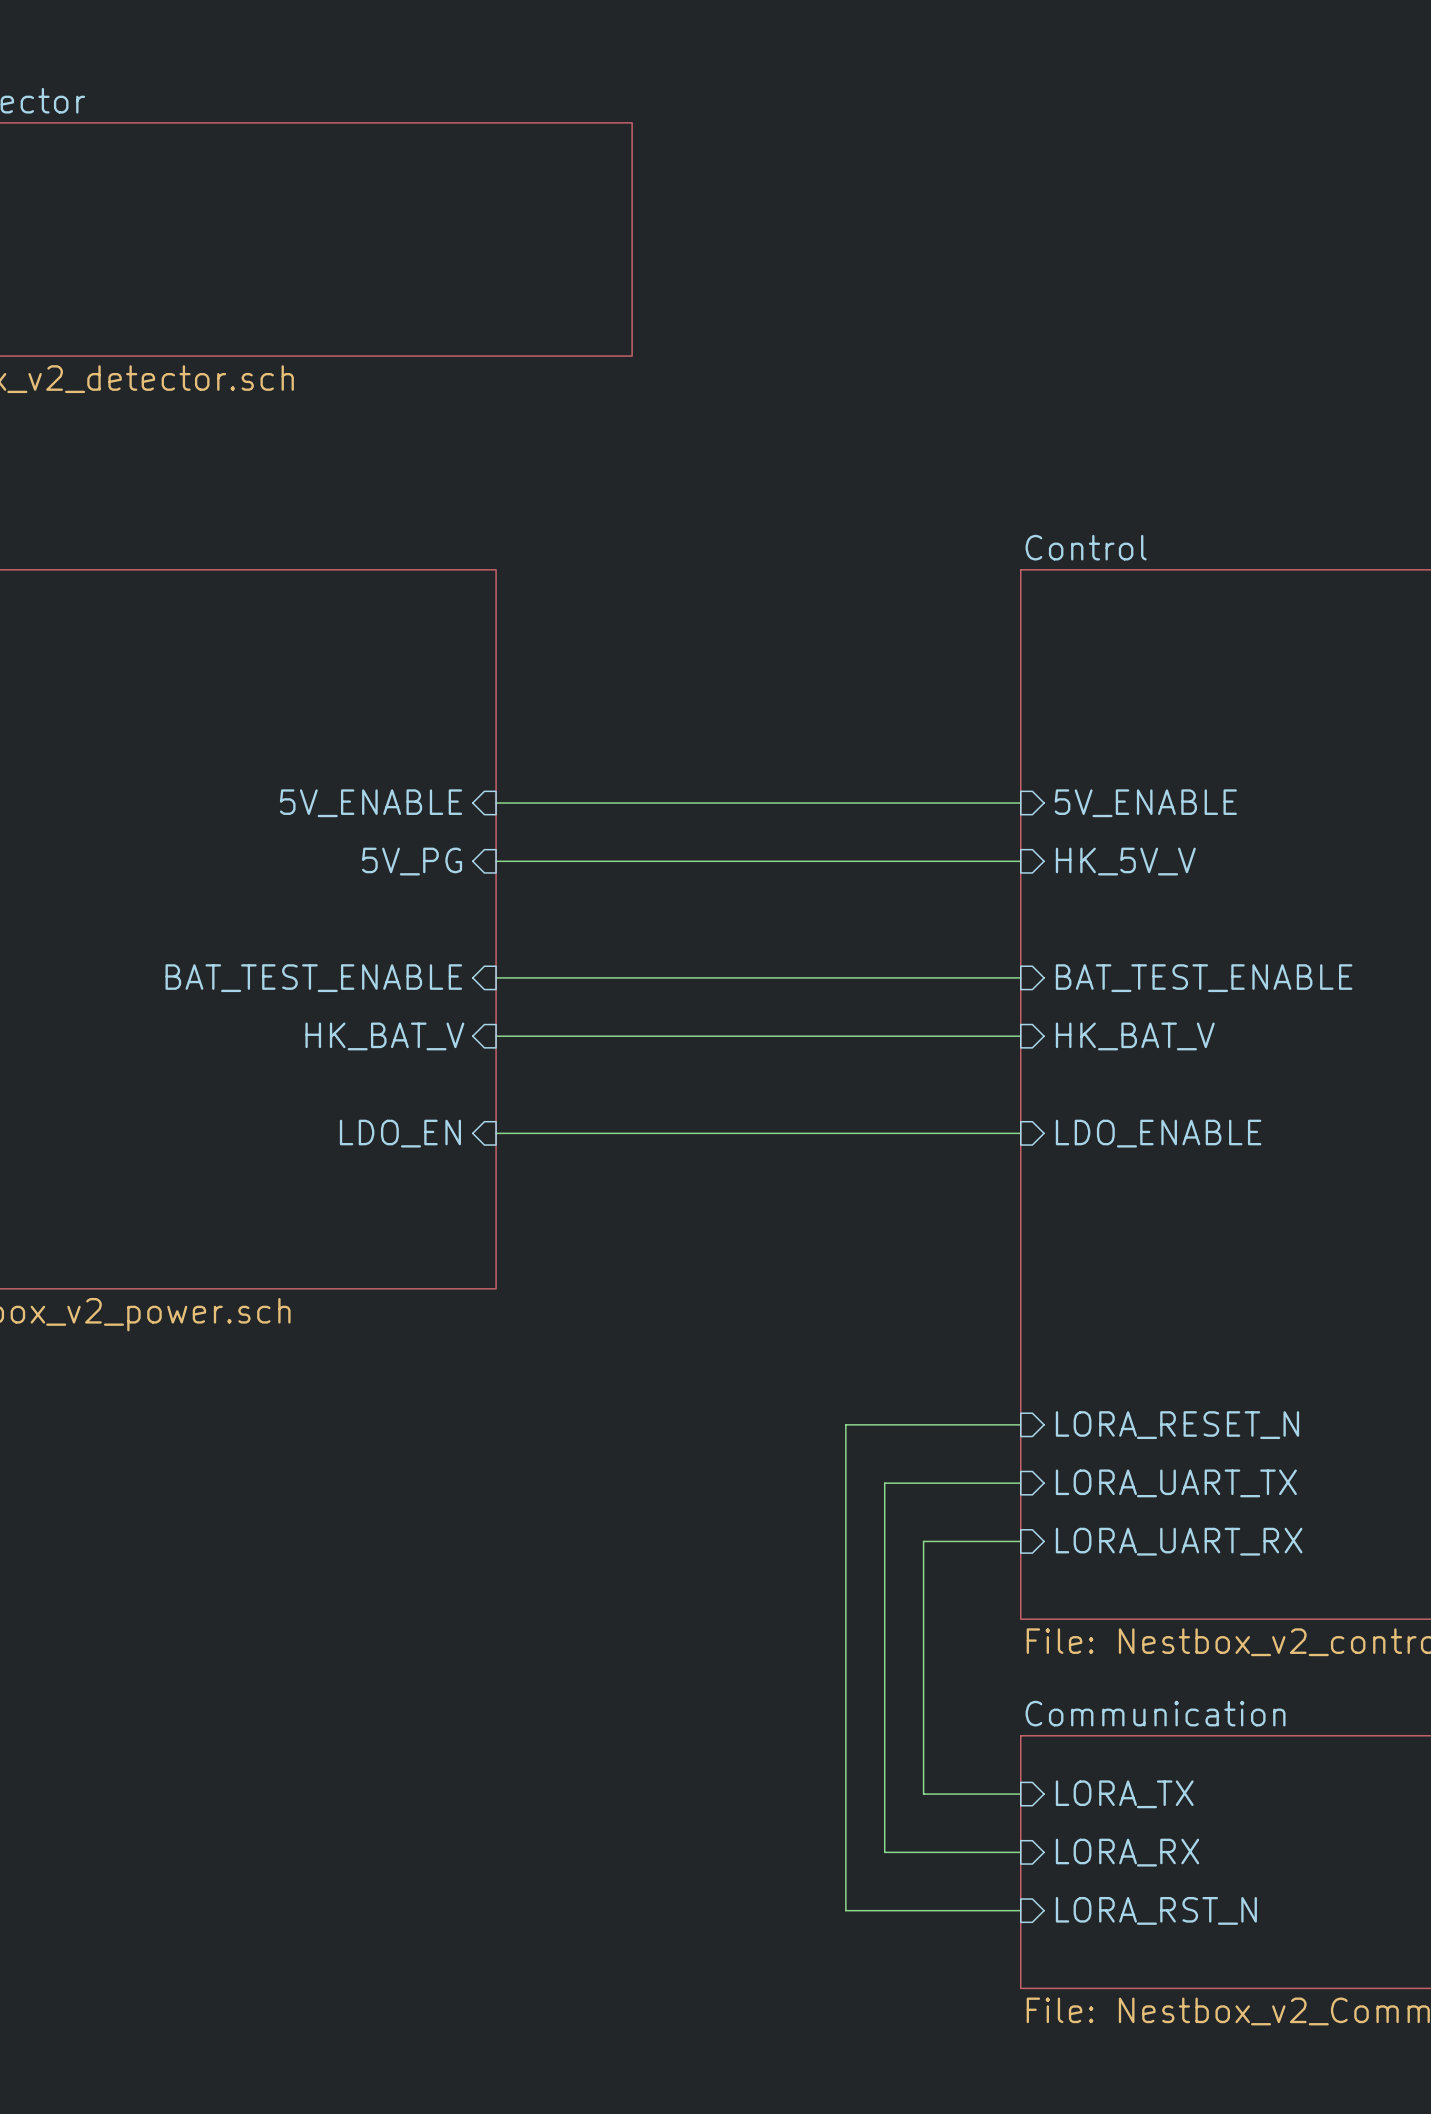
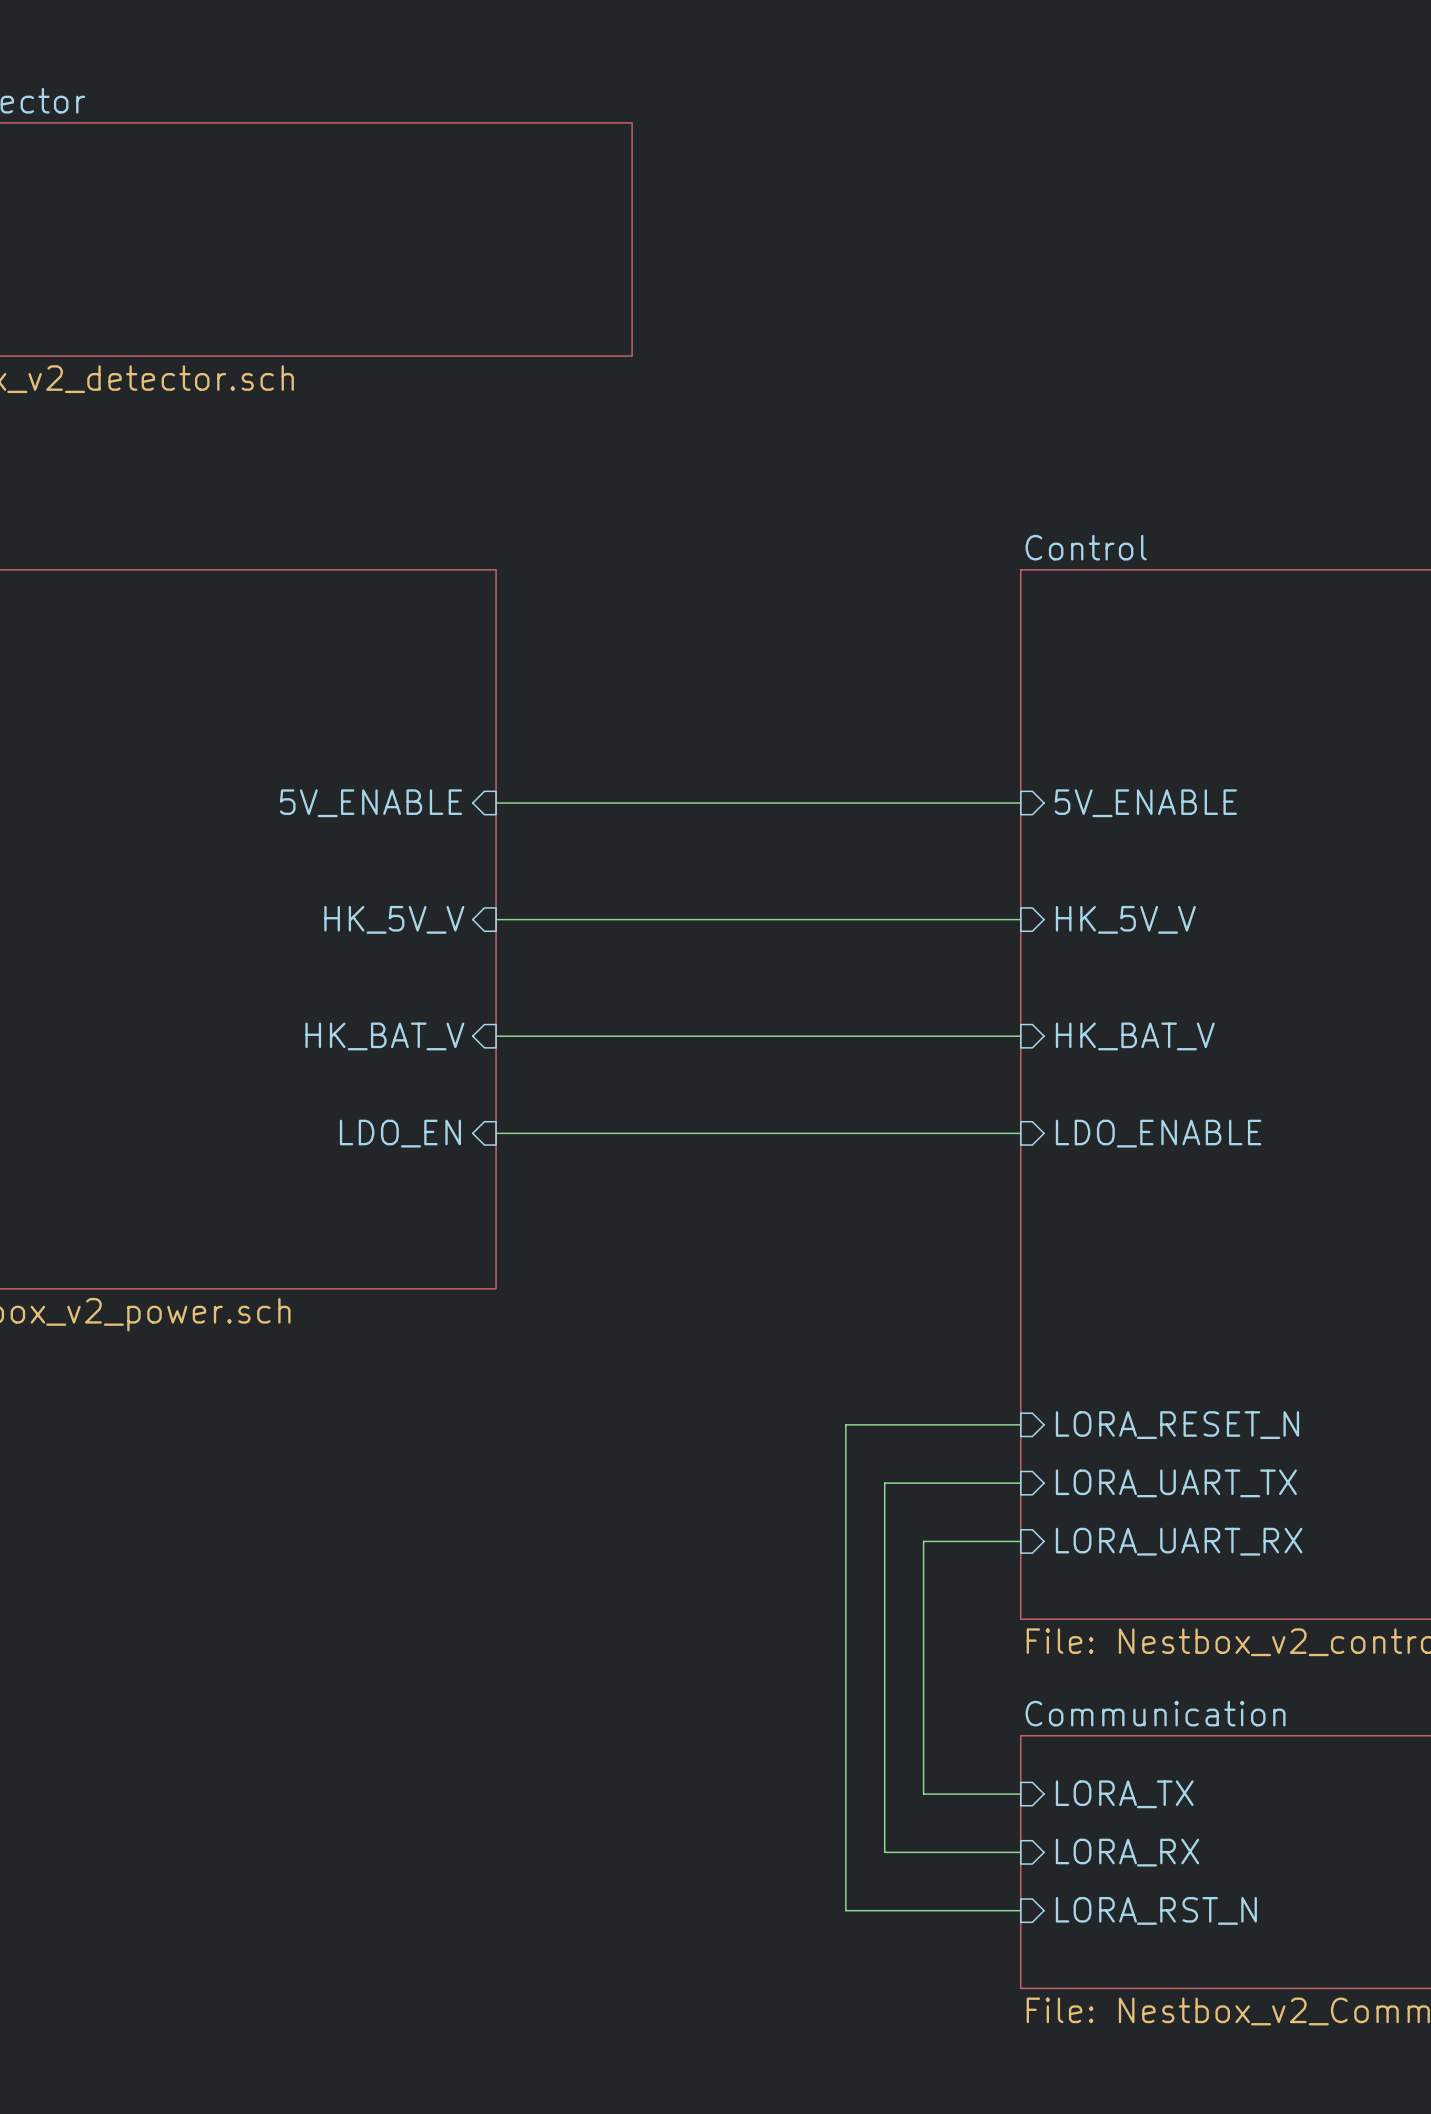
sheet pin: 5V_PG (412, 861) -> none
wire: (496, 861) (1020, 861) -> (496, 919) (1020, 919)
sheet pin position: HK_5V_V (1125, 861) -> HK_5V_V (1125, 919)
sheet pin: none -> HK_5V_V (394, 919)
wire: (496, 977) (1020, 977) -> none
sheet pin: BAT_TEST_ENABLE (313, 978) -> none
sheet pin: BAT_TEST_ENABLE (1204, 978) -> none

